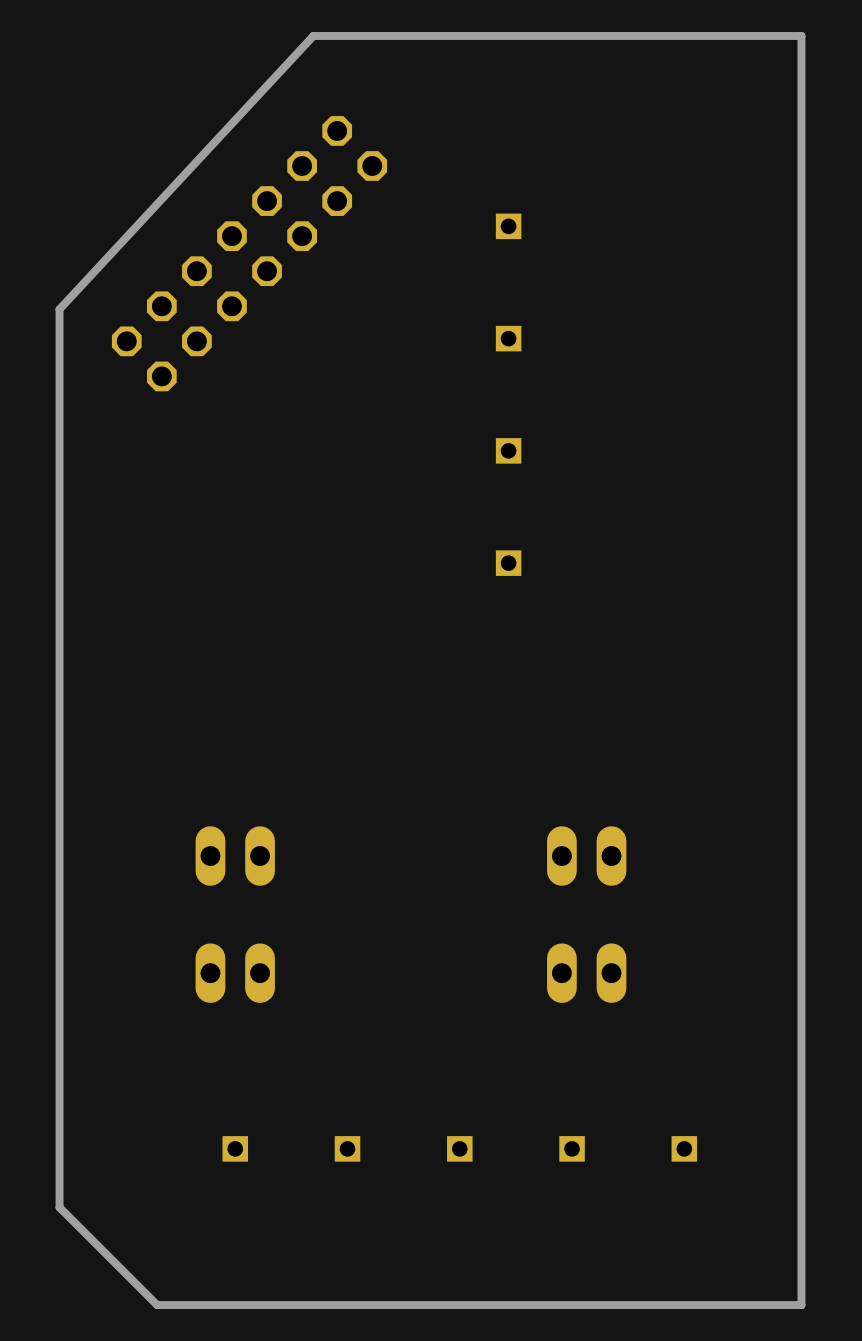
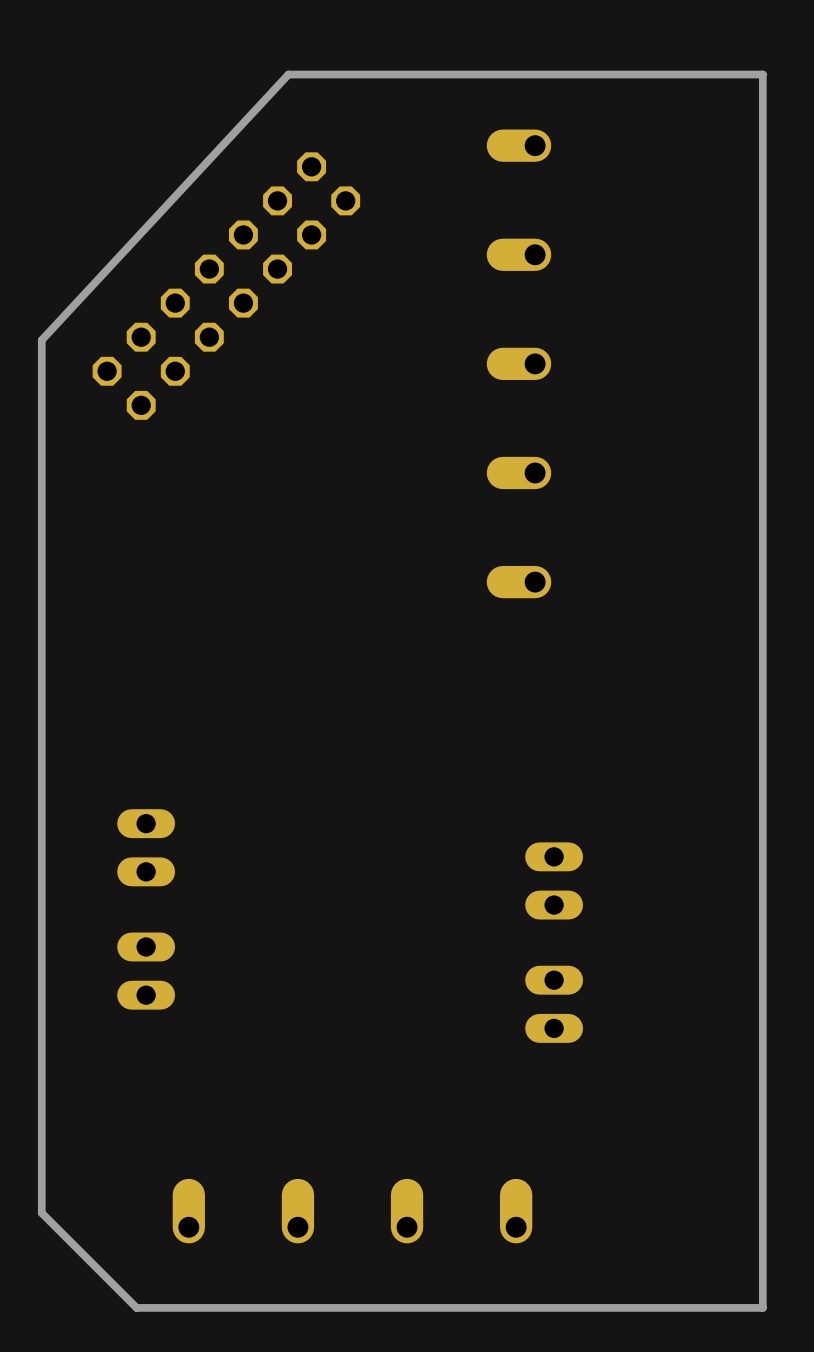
part: none -> (519, 145)
part: none -> (519, 254)
part: (508, 226) -> none
part: none -> (519, 363)
part: (508, 338) -> none
part: none -> (519, 472)
part: (508, 450) -> none
part: none -> (519, 582)
part: (508, 563) -> none
part: none -> (146, 847)
part: (235, 856) -> none
part rotation: 0° (586, 856) -> 90° clockwise (554, 880)
part: none -> (146, 971)
part: (235, 973) -> none
part rotation: 0° (586, 973) -> 90° clockwise (554, 1004)
part: (235, 1148) -> none
part: (347, 1148) -> none
part: (459, 1148) -> none
part: (572, 1148) -> none
part: (684, 1148) -> none
part: none -> (188, 1211)
part: none -> (297, 1211)
part: none -> (407, 1211)
part: none -> (516, 1211)

